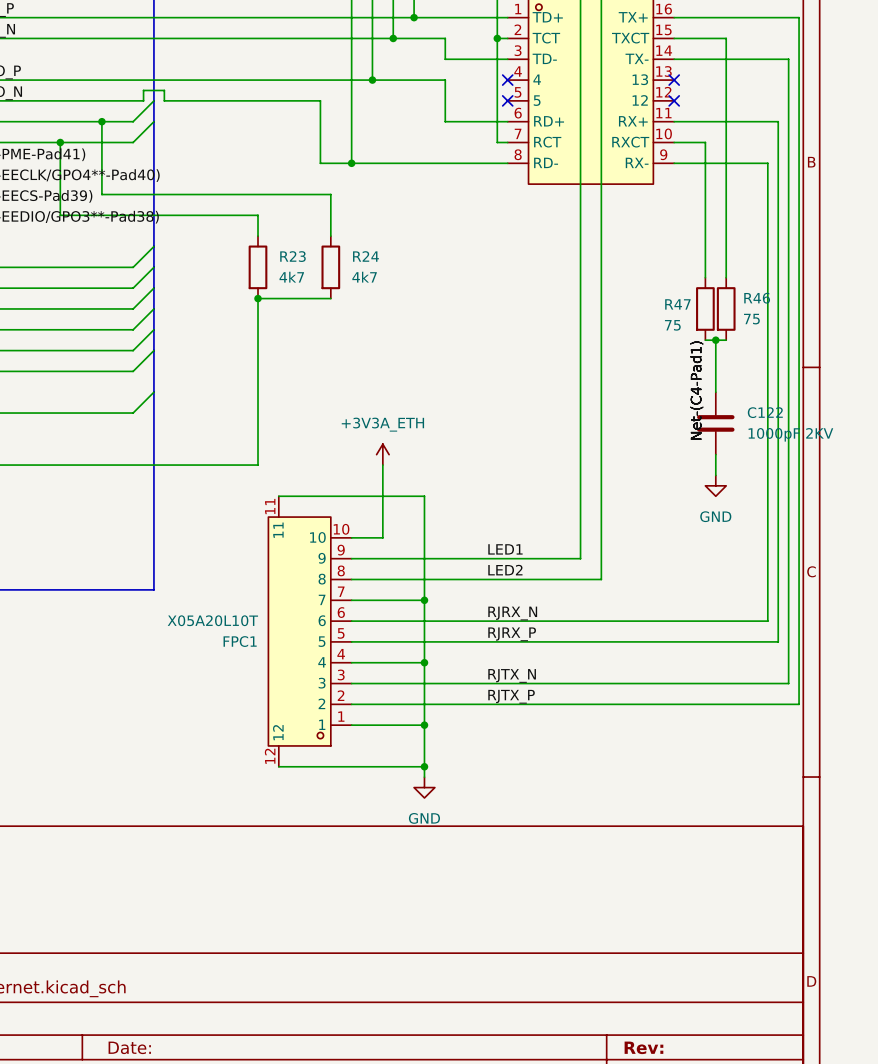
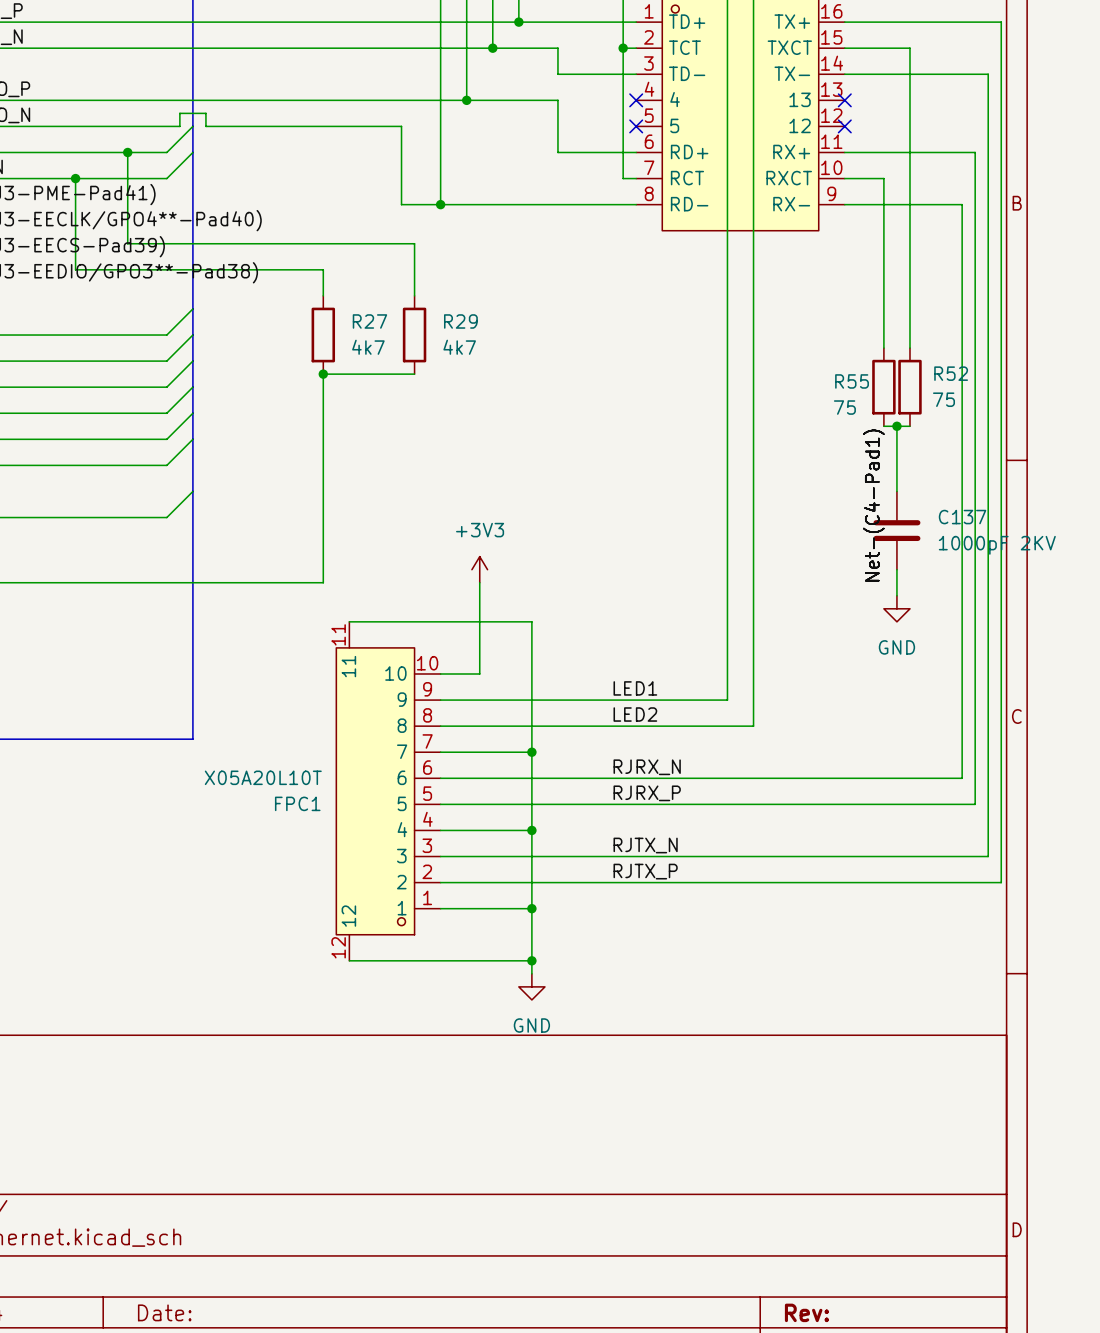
R23 name: R23 (292, 256) -> R27 (369, 321)
R24 name: R24 (365, 256) -> R29 (460, 321)
R46 name: R46 (757, 298) -> R52 (951, 373)
R47 name: R47 (677, 304) -> R55 (852, 381)
C122 name: C122 (765, 412) -> C137 (962, 517)
power symbol: +3V3A_ETH (382, 454) -> +3V3 (479, 569)

